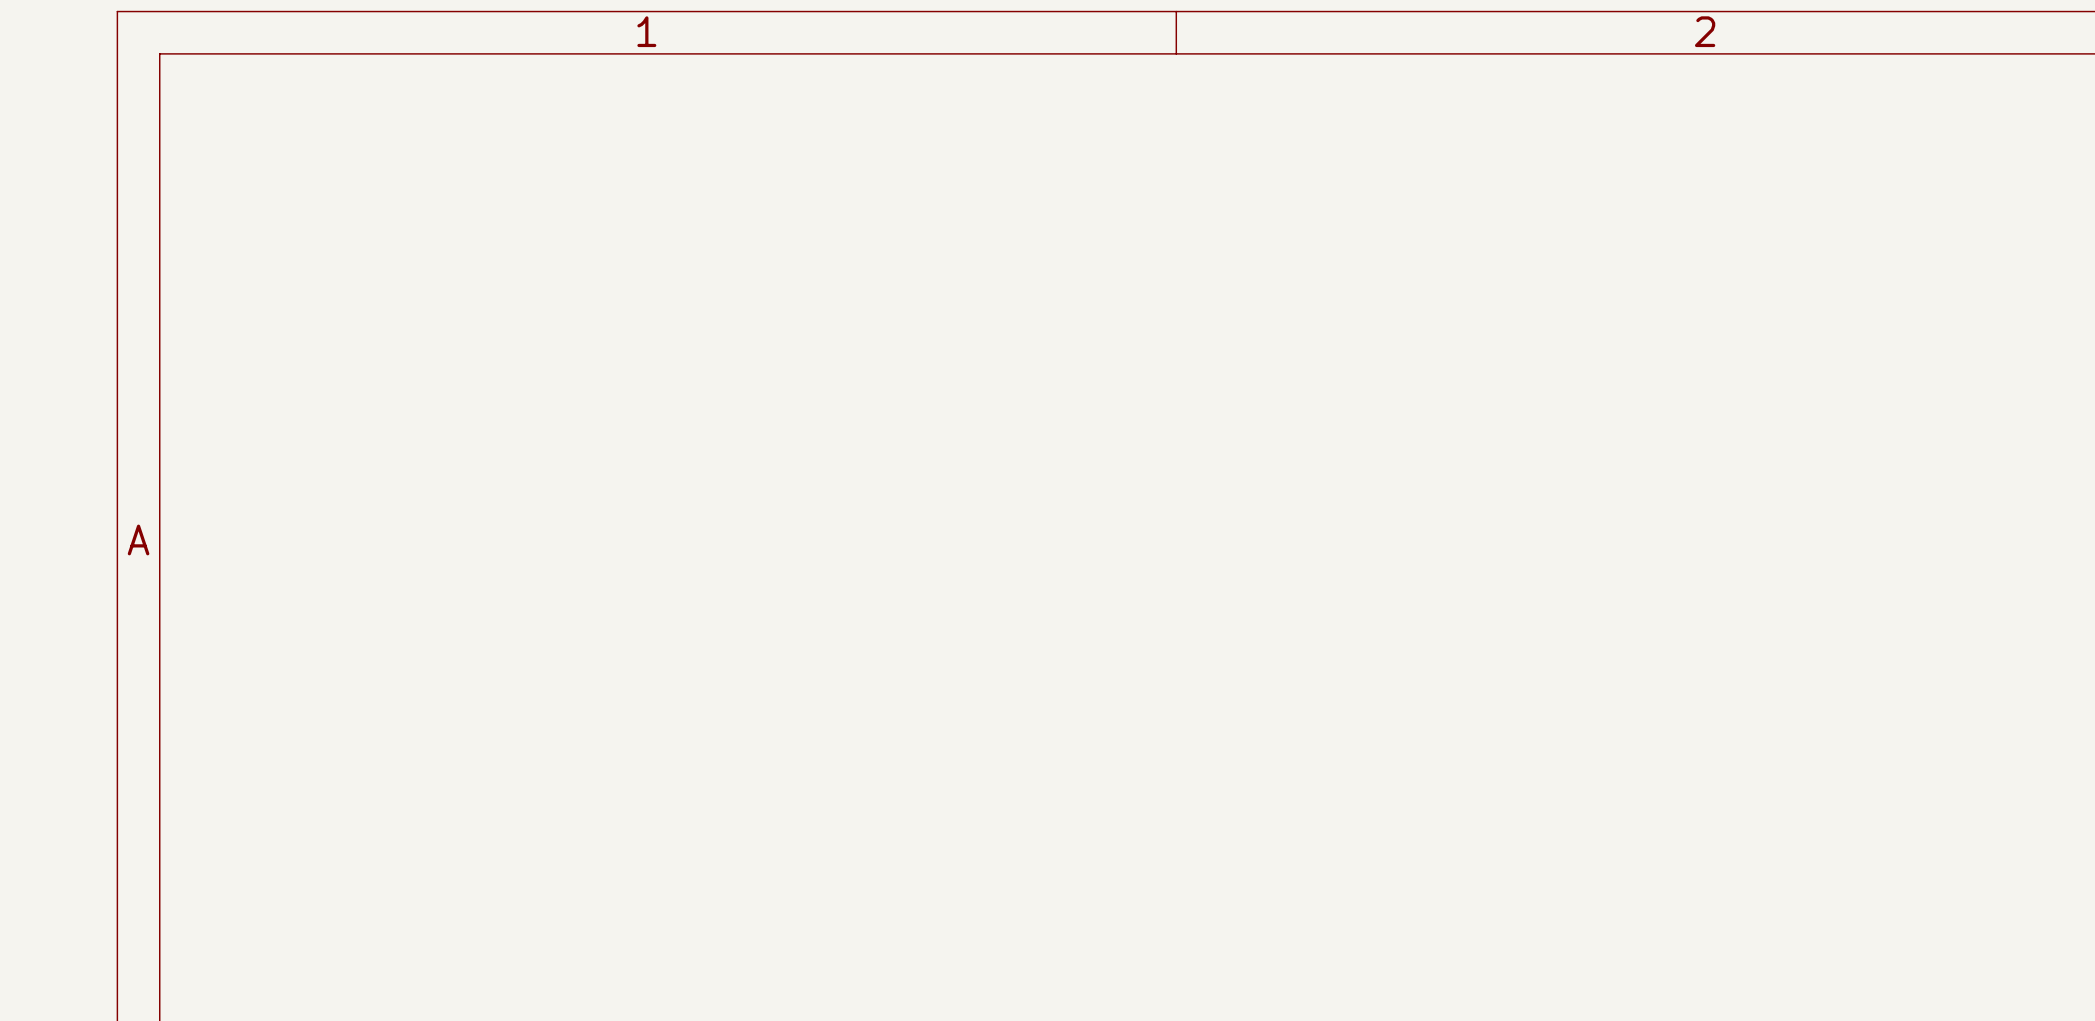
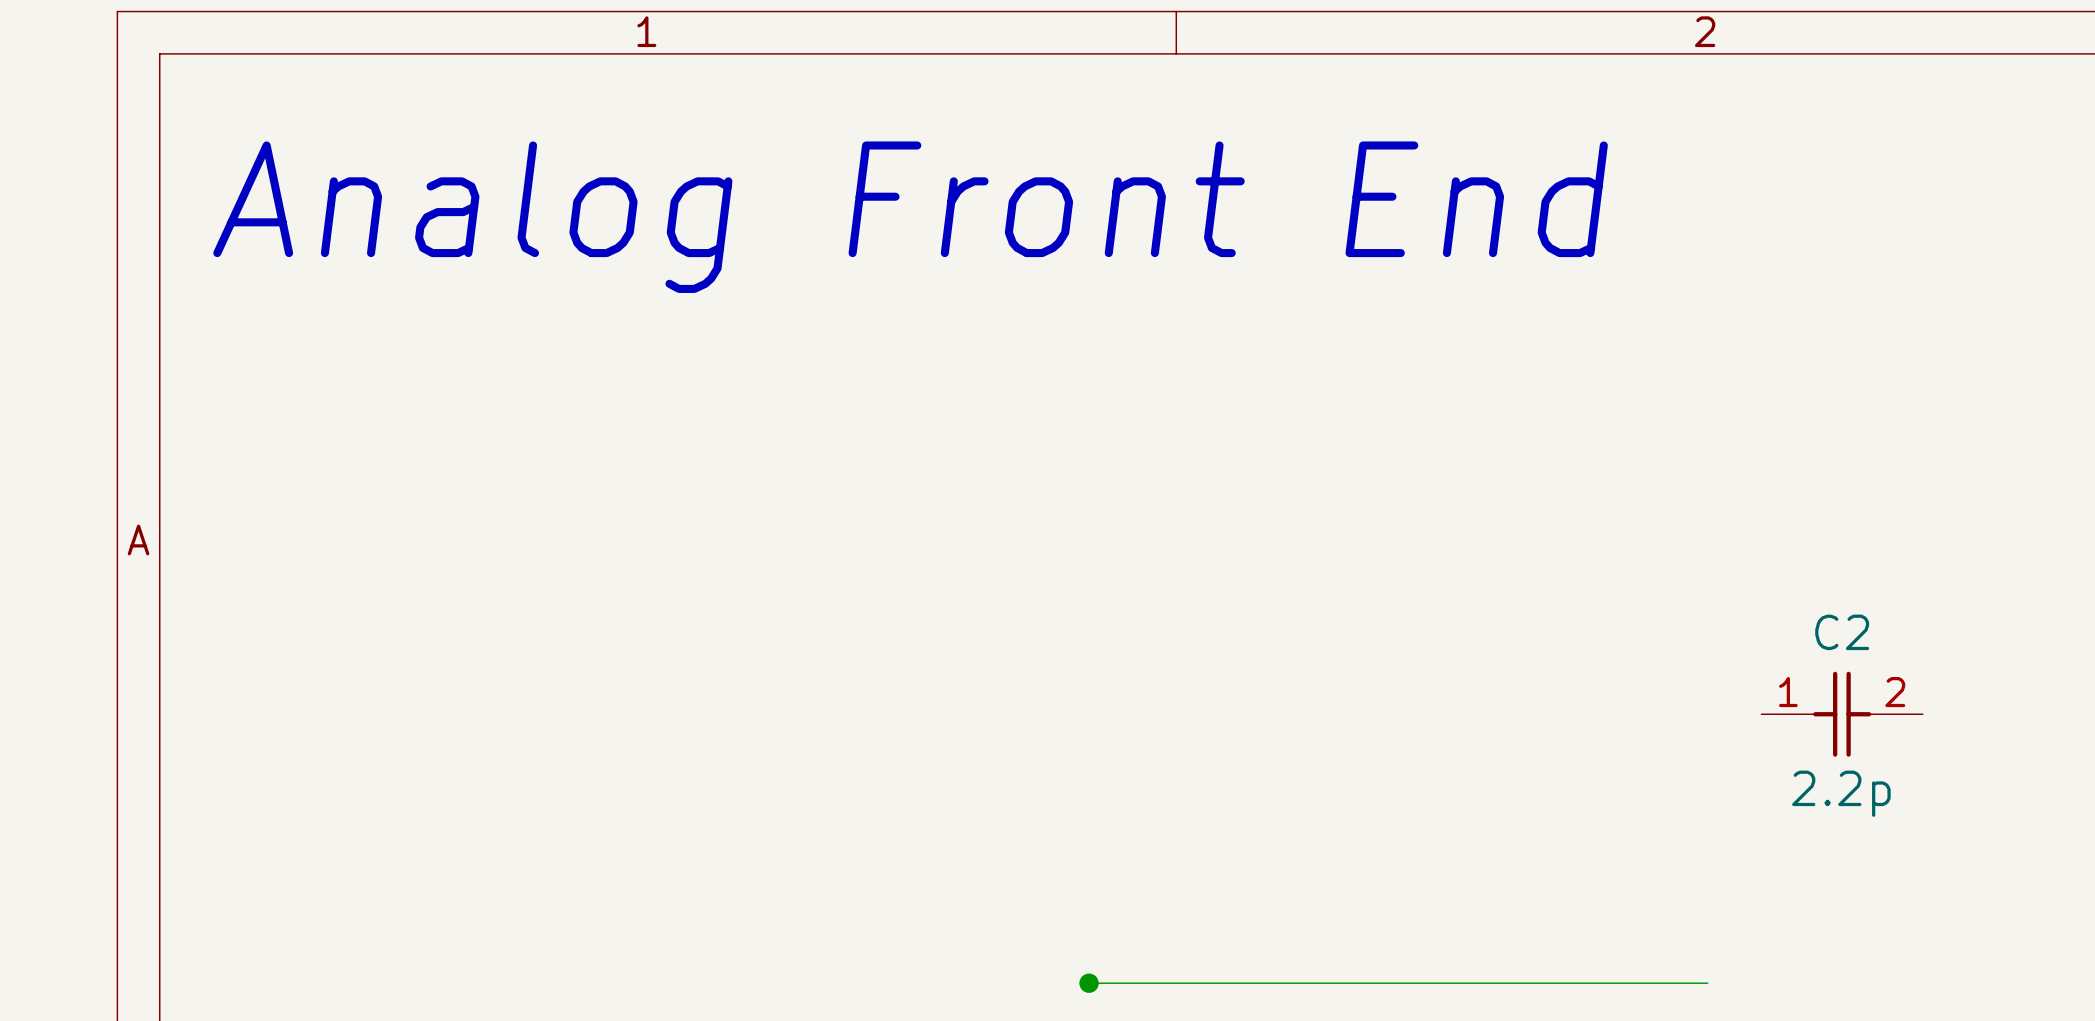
text: none -> Analog Front End (910, 217)
C2: none -> 2.2p (1842, 714)
wire: none -> (1089, 983) (1707, 983)
junction: none -> (1089, 983)

